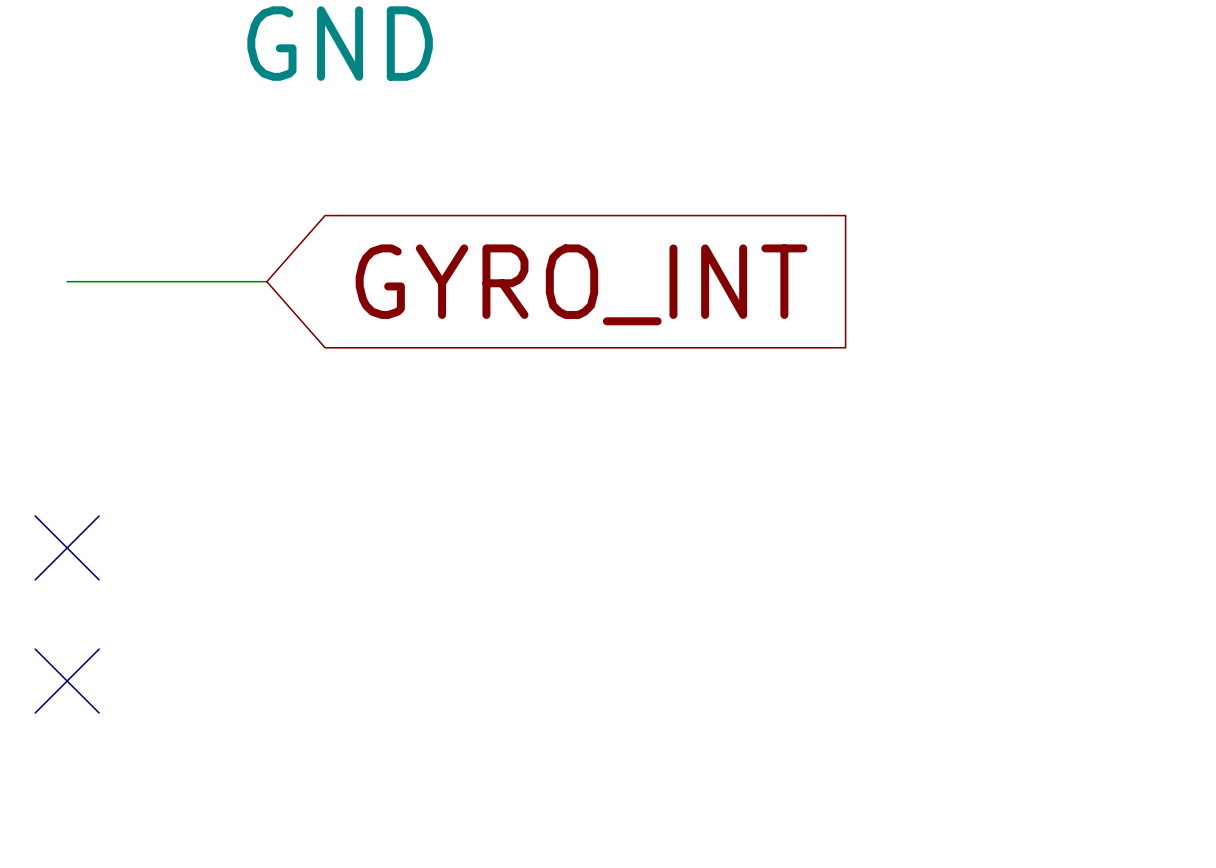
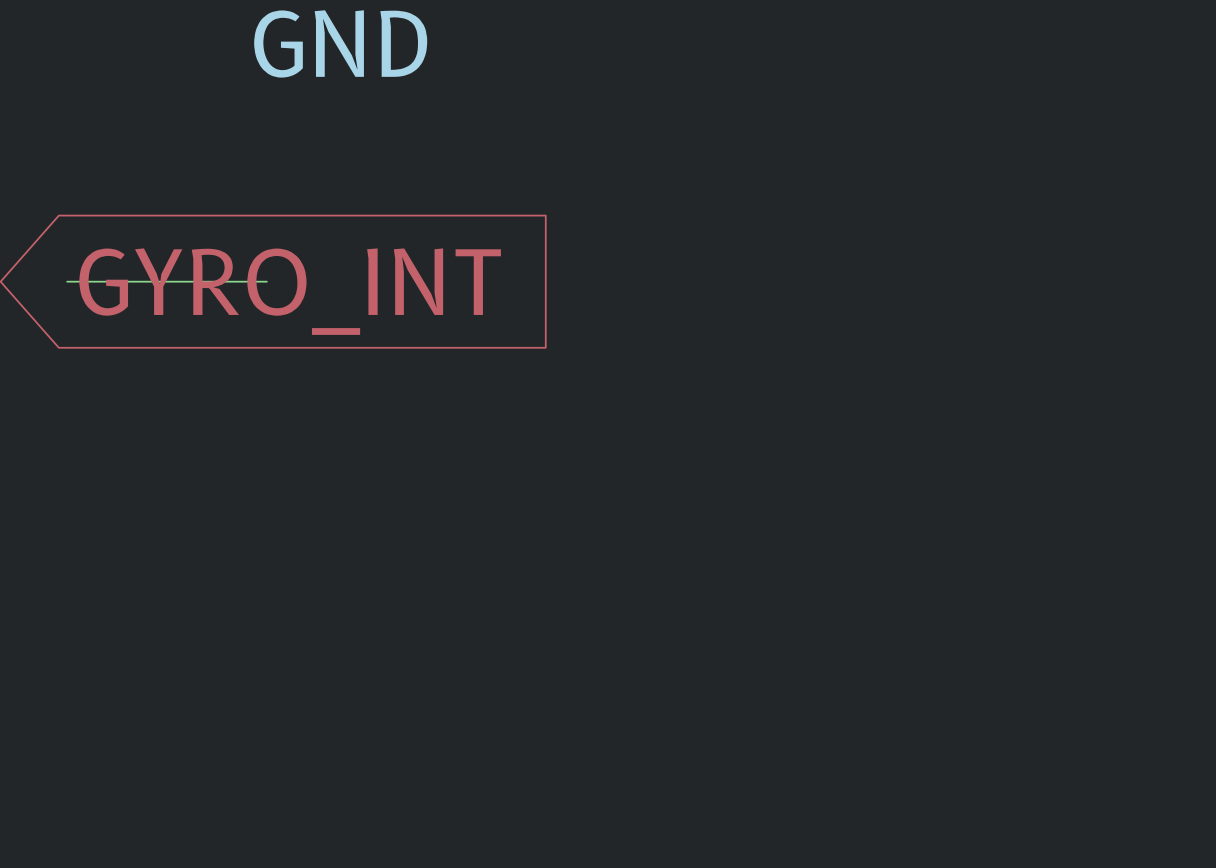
global label position: GYRO_INT (581, 284) -> GYRO_INT (290, 291)
no-connect mark: (67, 547) -> none
no-connect mark: (67, 681) -> none

